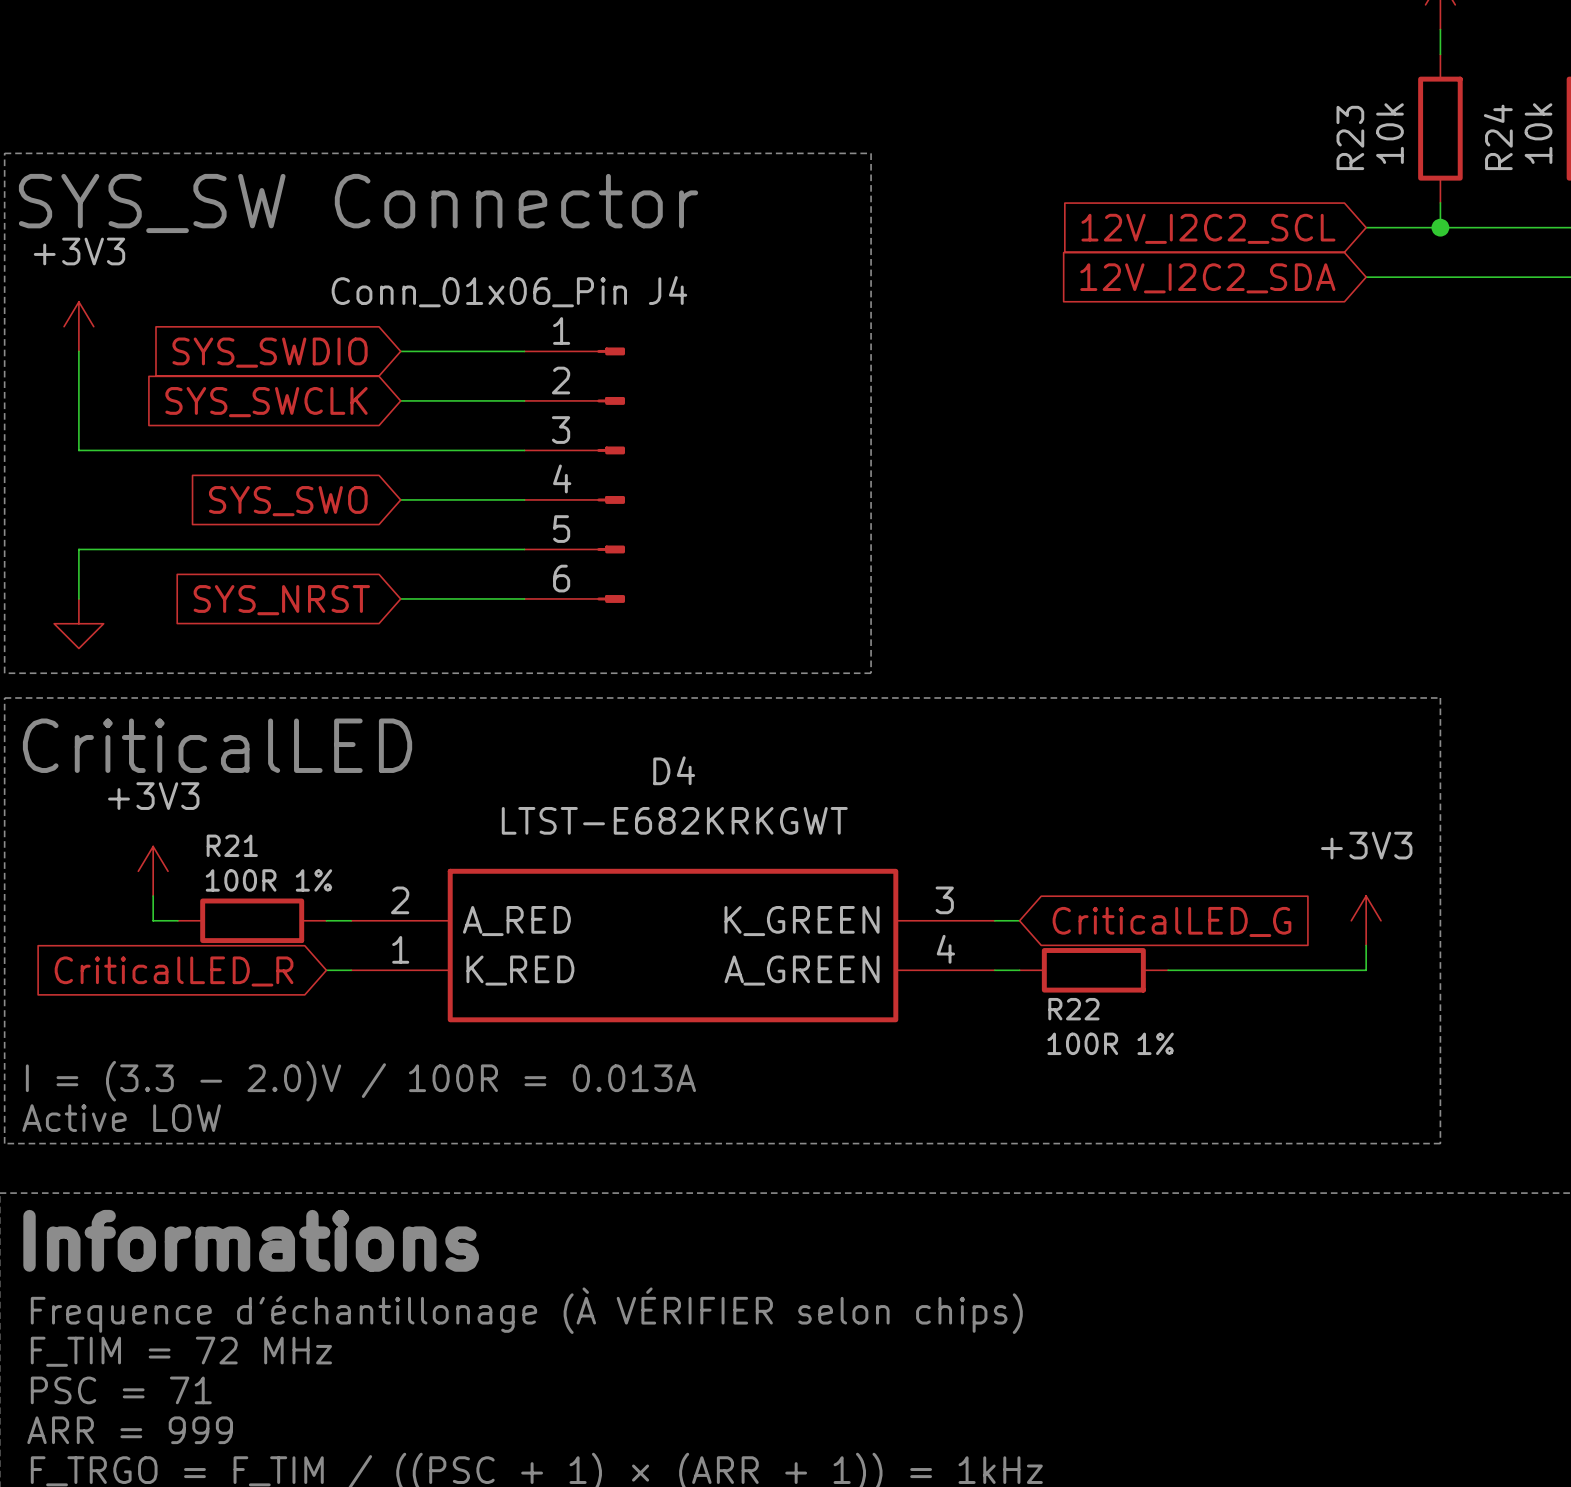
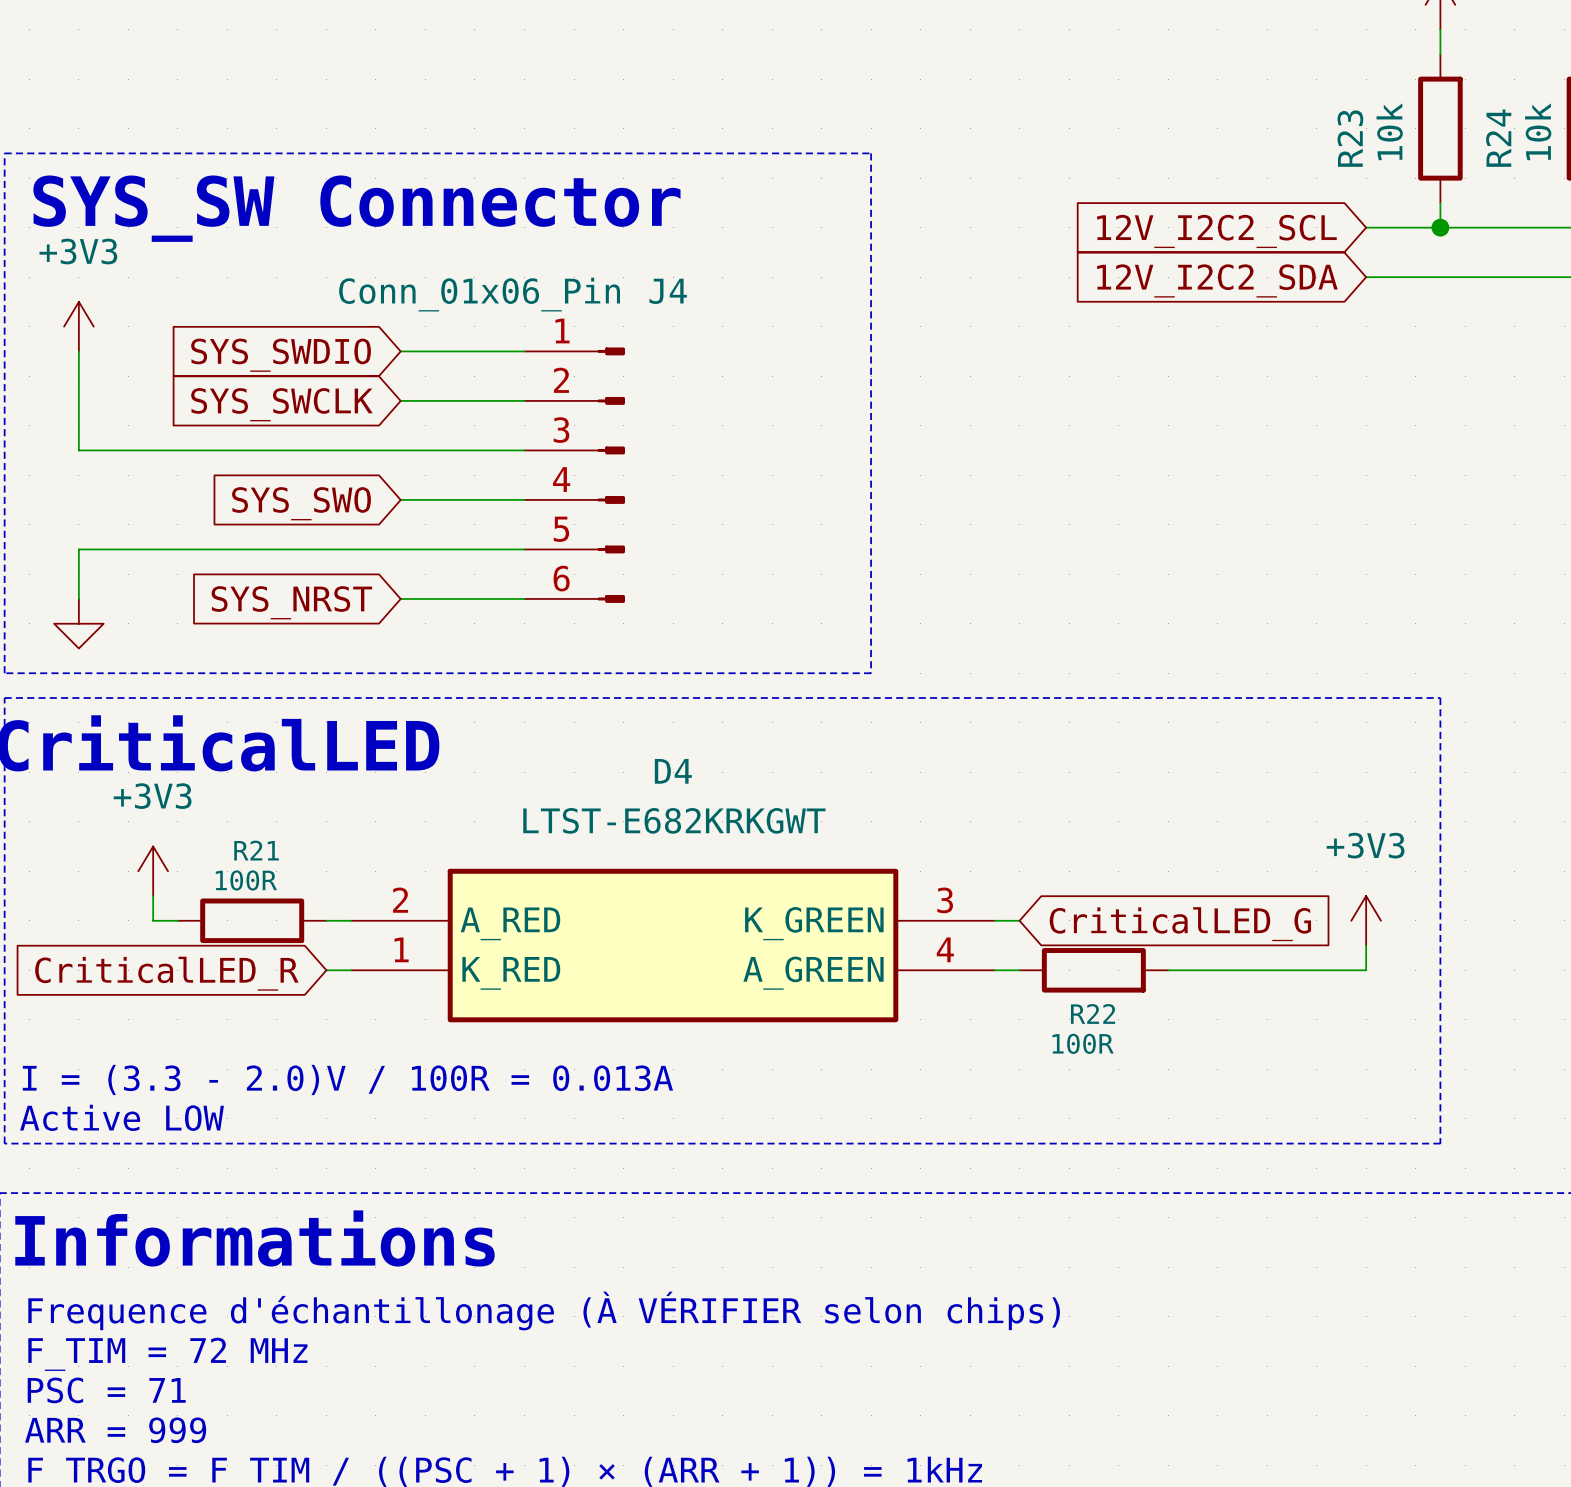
R21 name position: R21 (232, 845) -> R21 (256, 850)
R21 value: 100R 1% (268, 880) -> 100R (246, 880)
R22 name position: R22 (1073, 1009) -> R22 (1093, 1013)
R22 value: 100R 1% (1110, 1043) -> 100R (1083, 1043)

